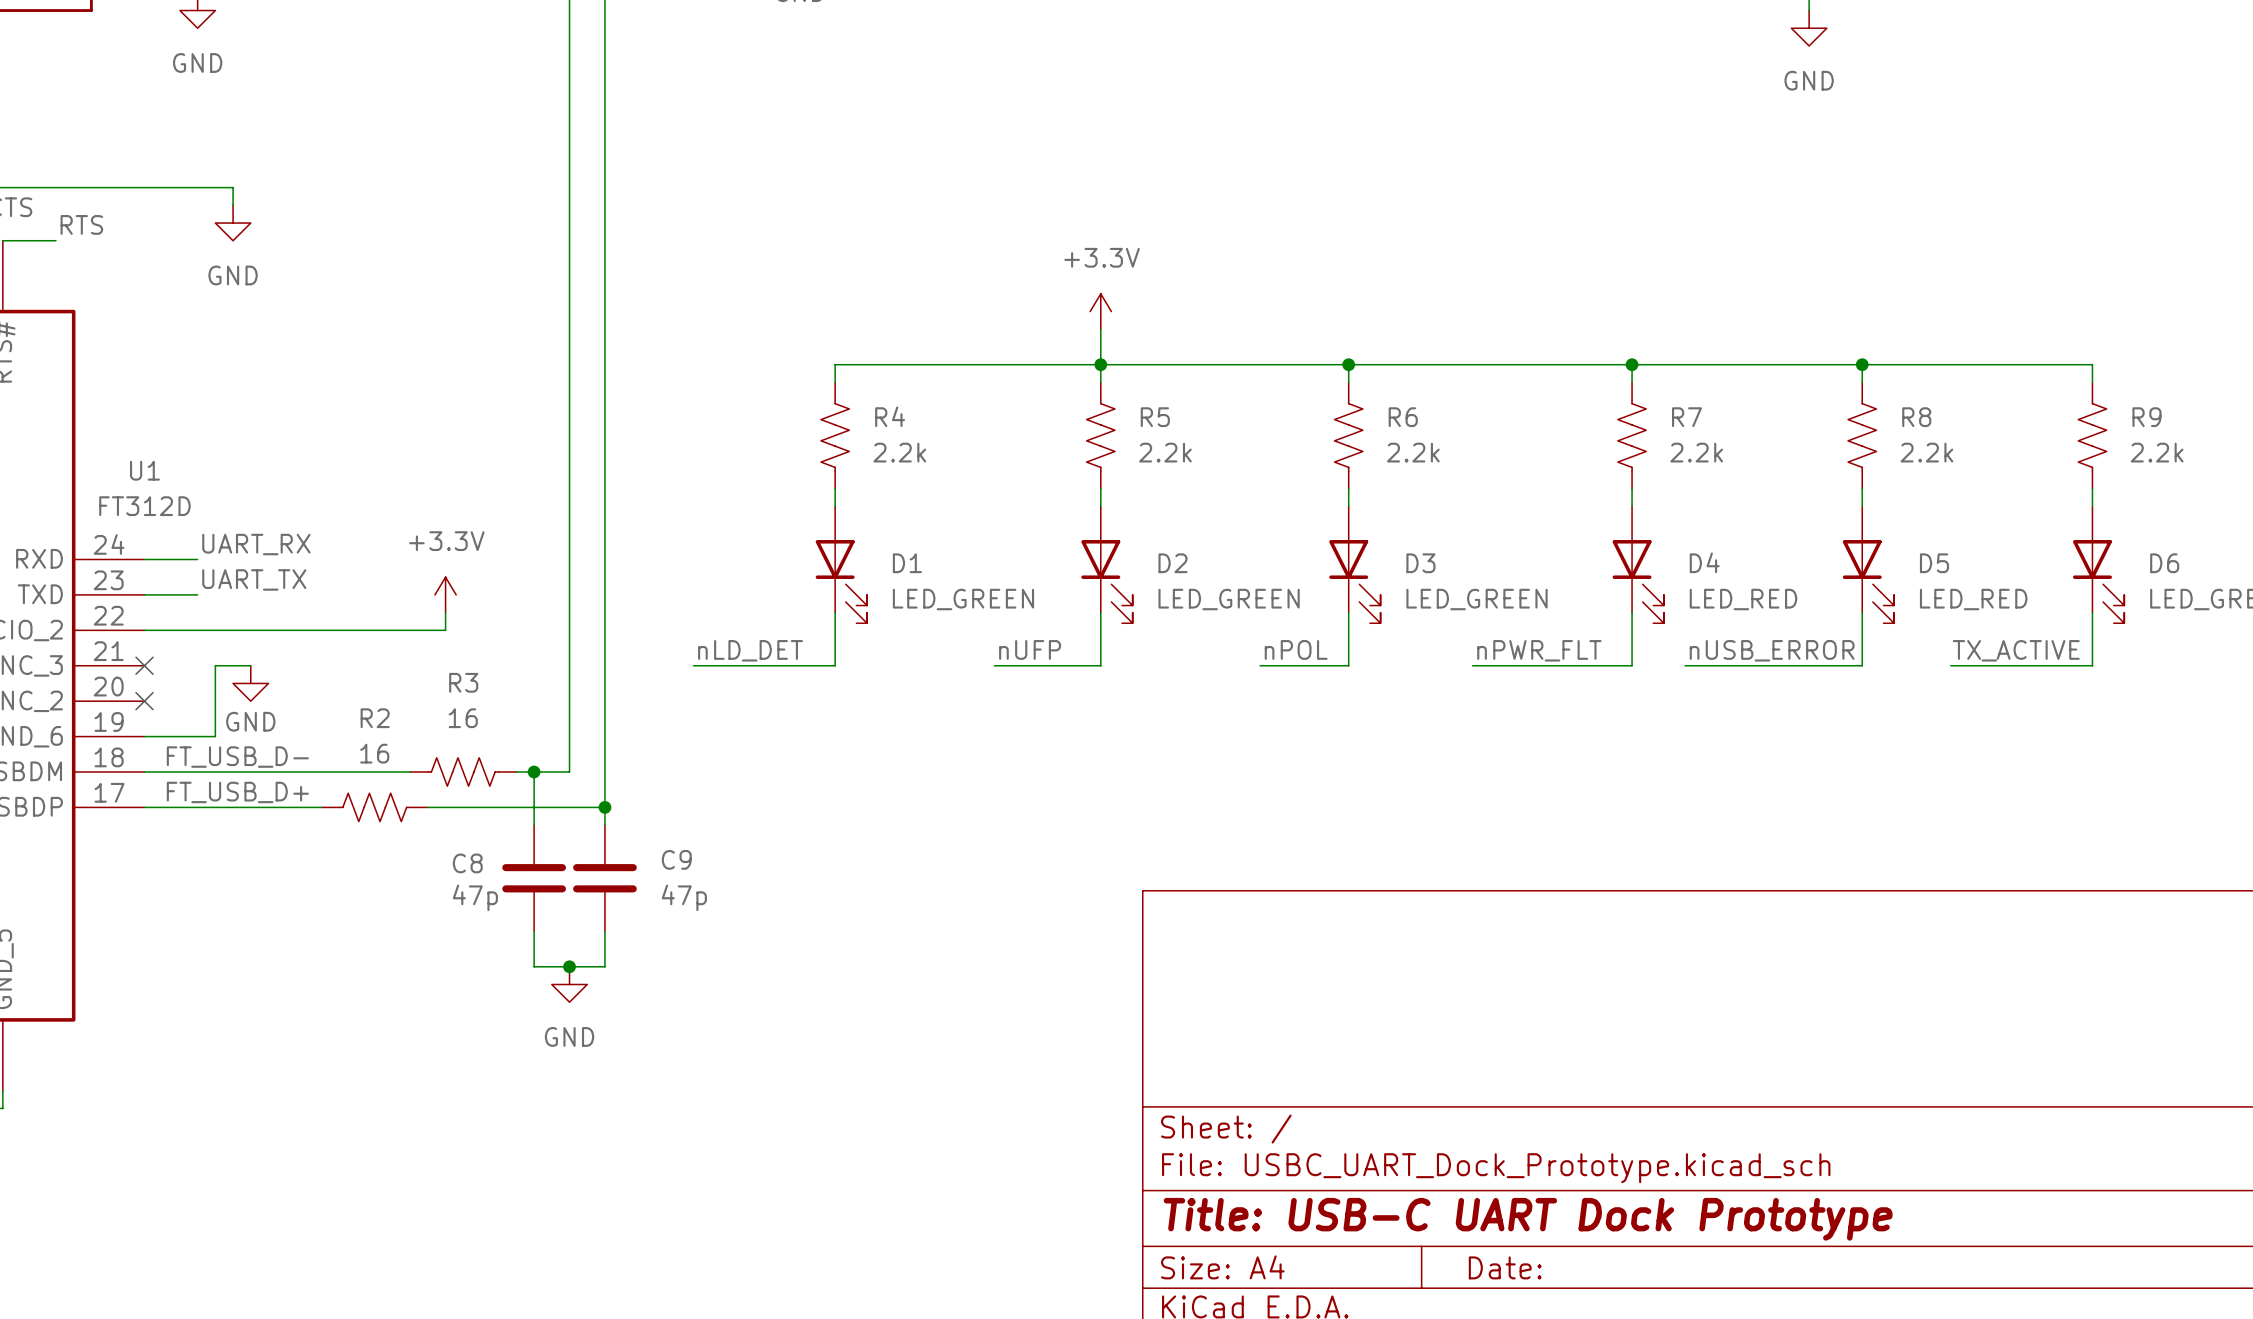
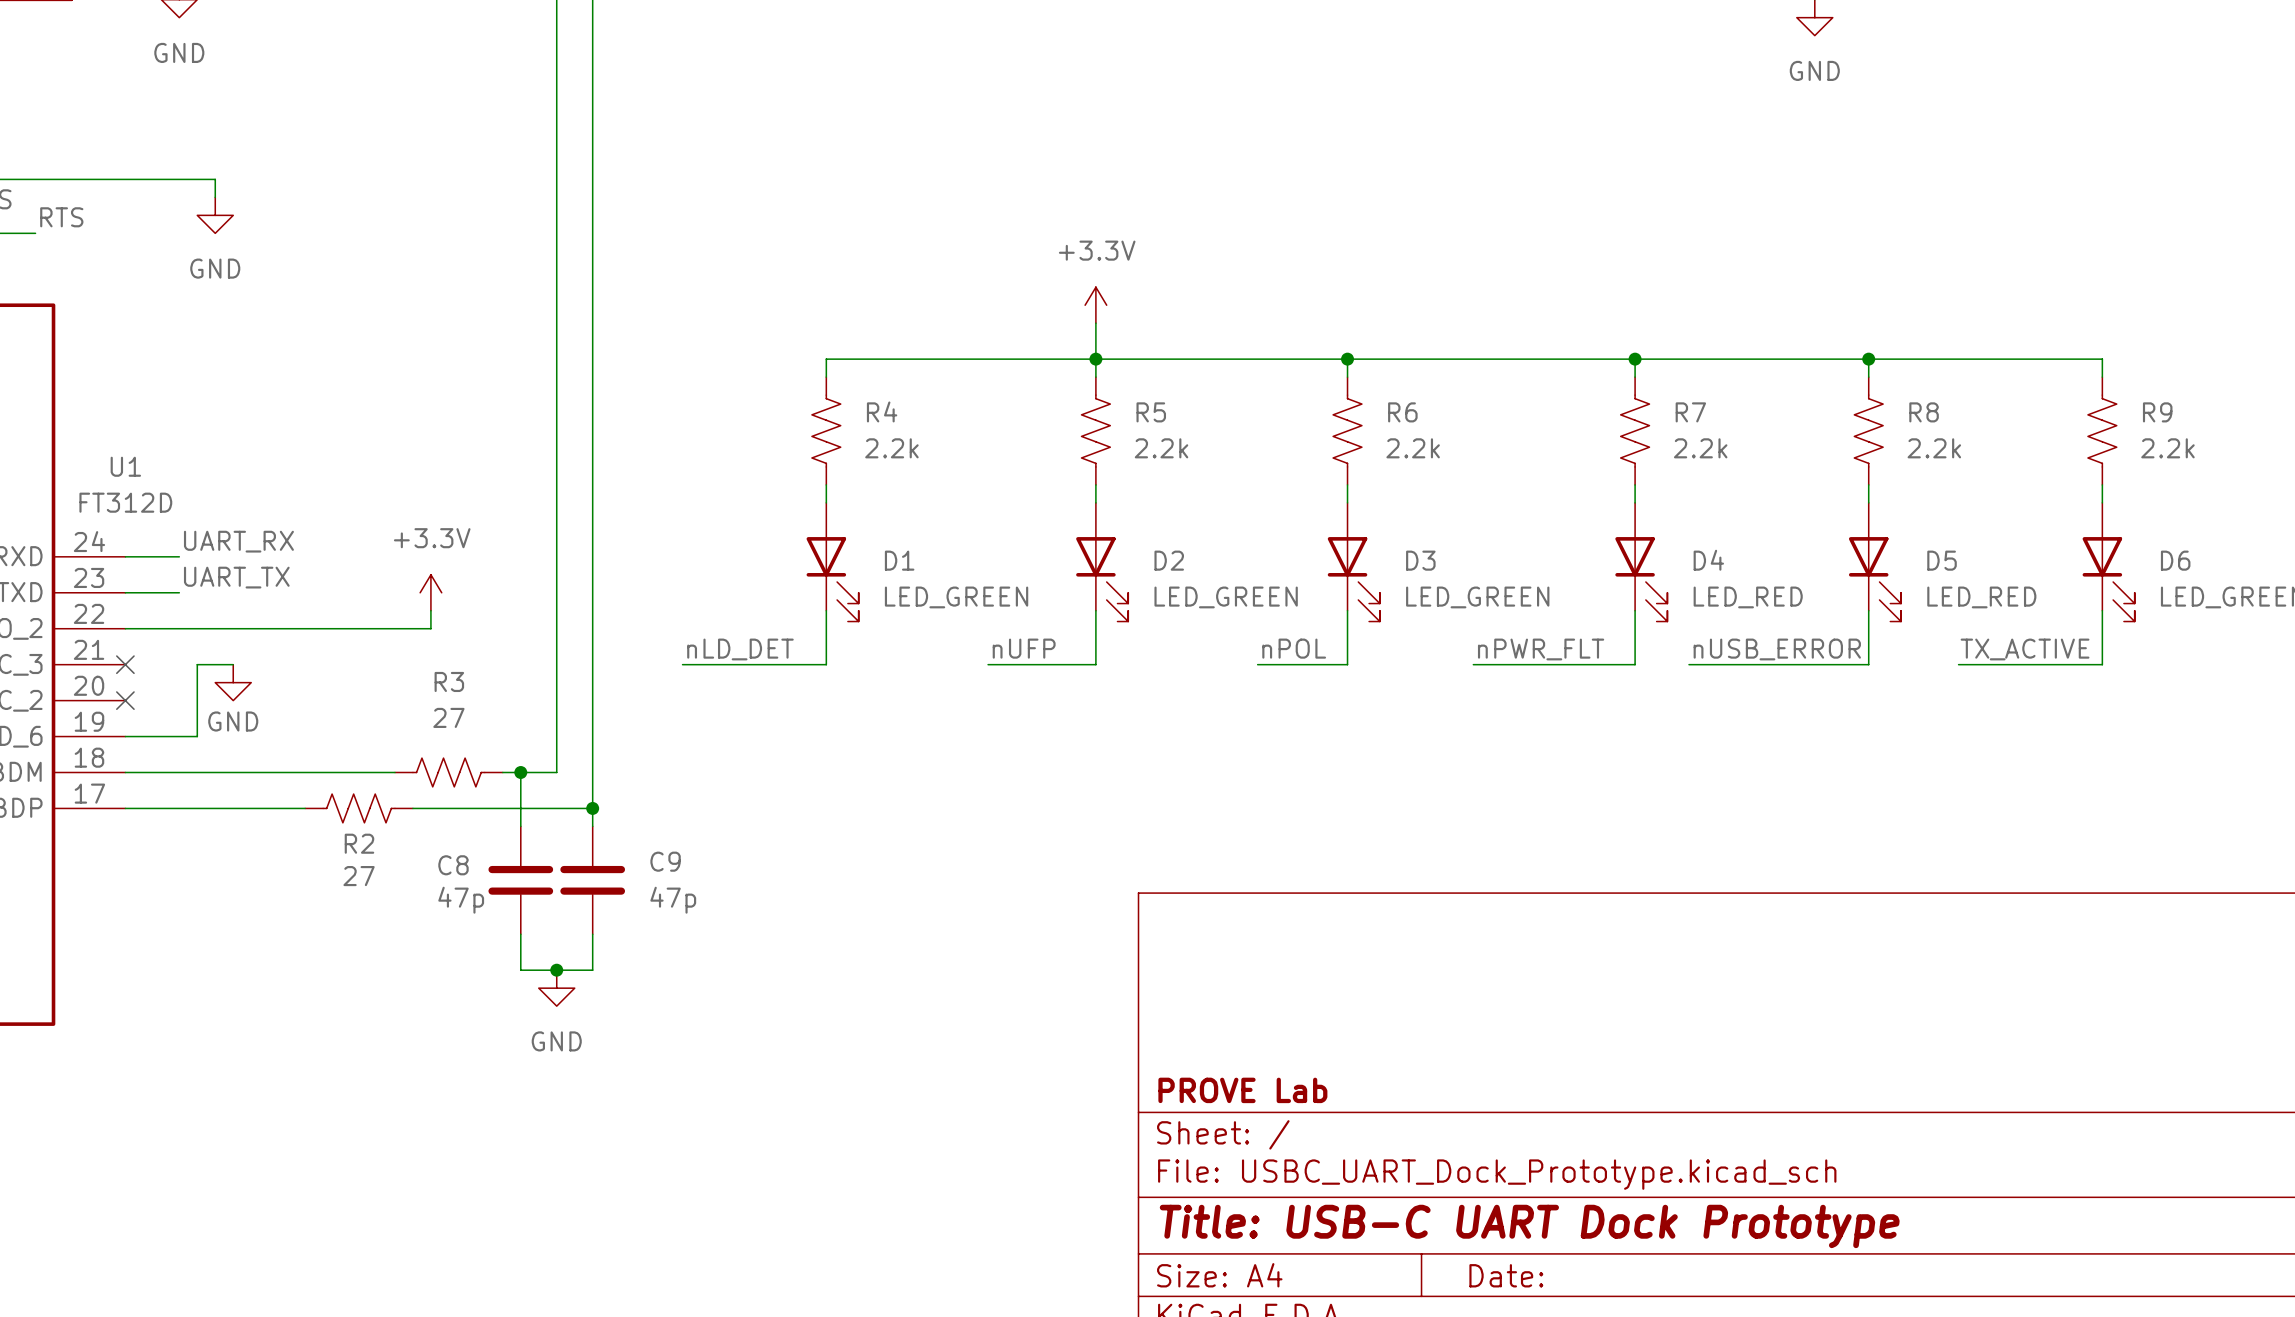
R2 name position: R2 (375, 718) -> R2 (359, 843)
R3 value: 16 (463, 718) -> 27 (448, 717)
R2 value: 16 (374, 753) -> 27 (359, 876)
label: FT_USB_D- (237, 757) -> none
label: FT_USB_D+ (237, 792) -> none
title block: none -> PROVE Lab (1242, 1090)

